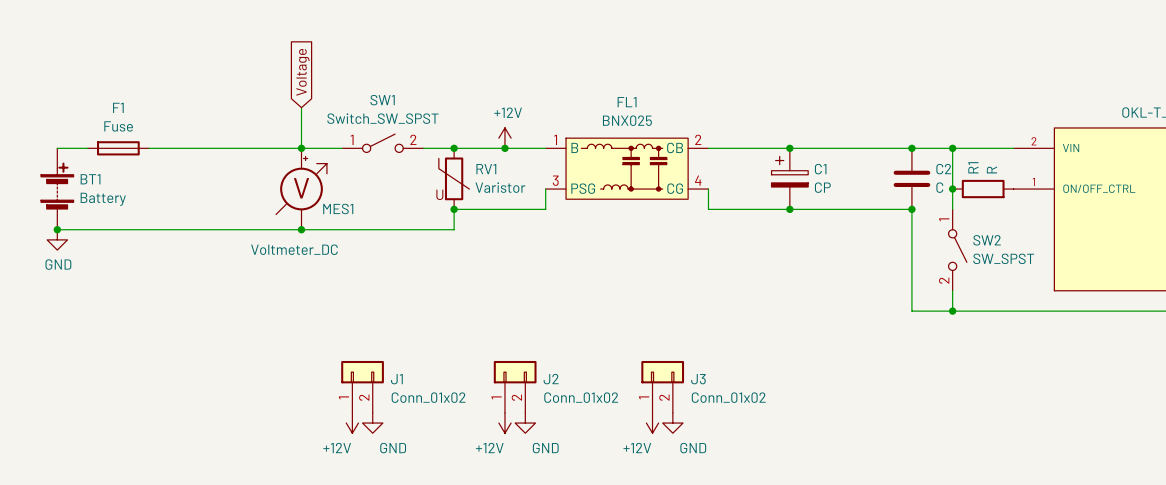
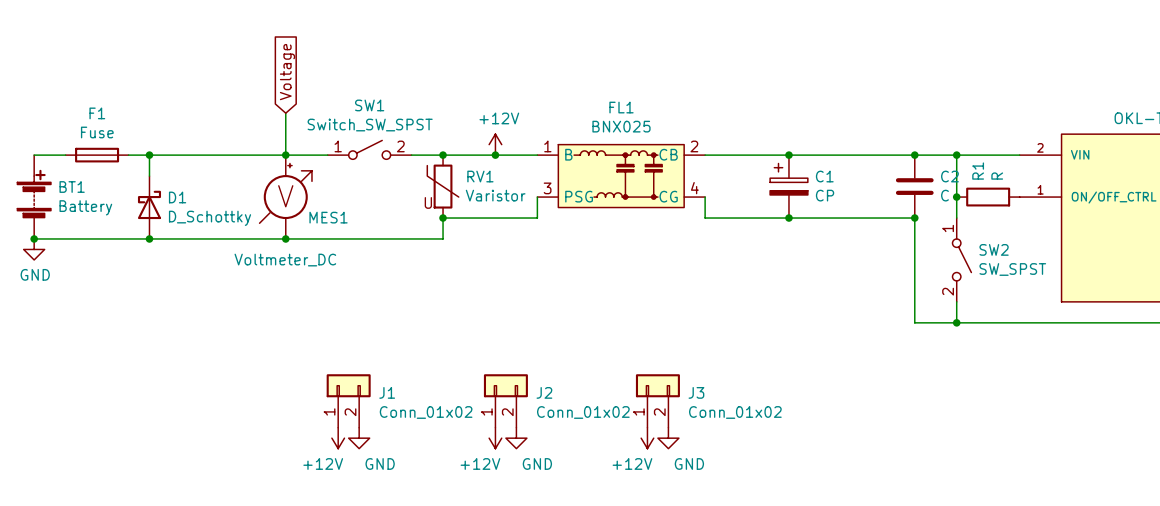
wire: none -> (149, 155) (149, 176)
junction: none -> (149, 155)
D1: none -> D_Schottky (149, 207)
junction: none -> (149, 238)

